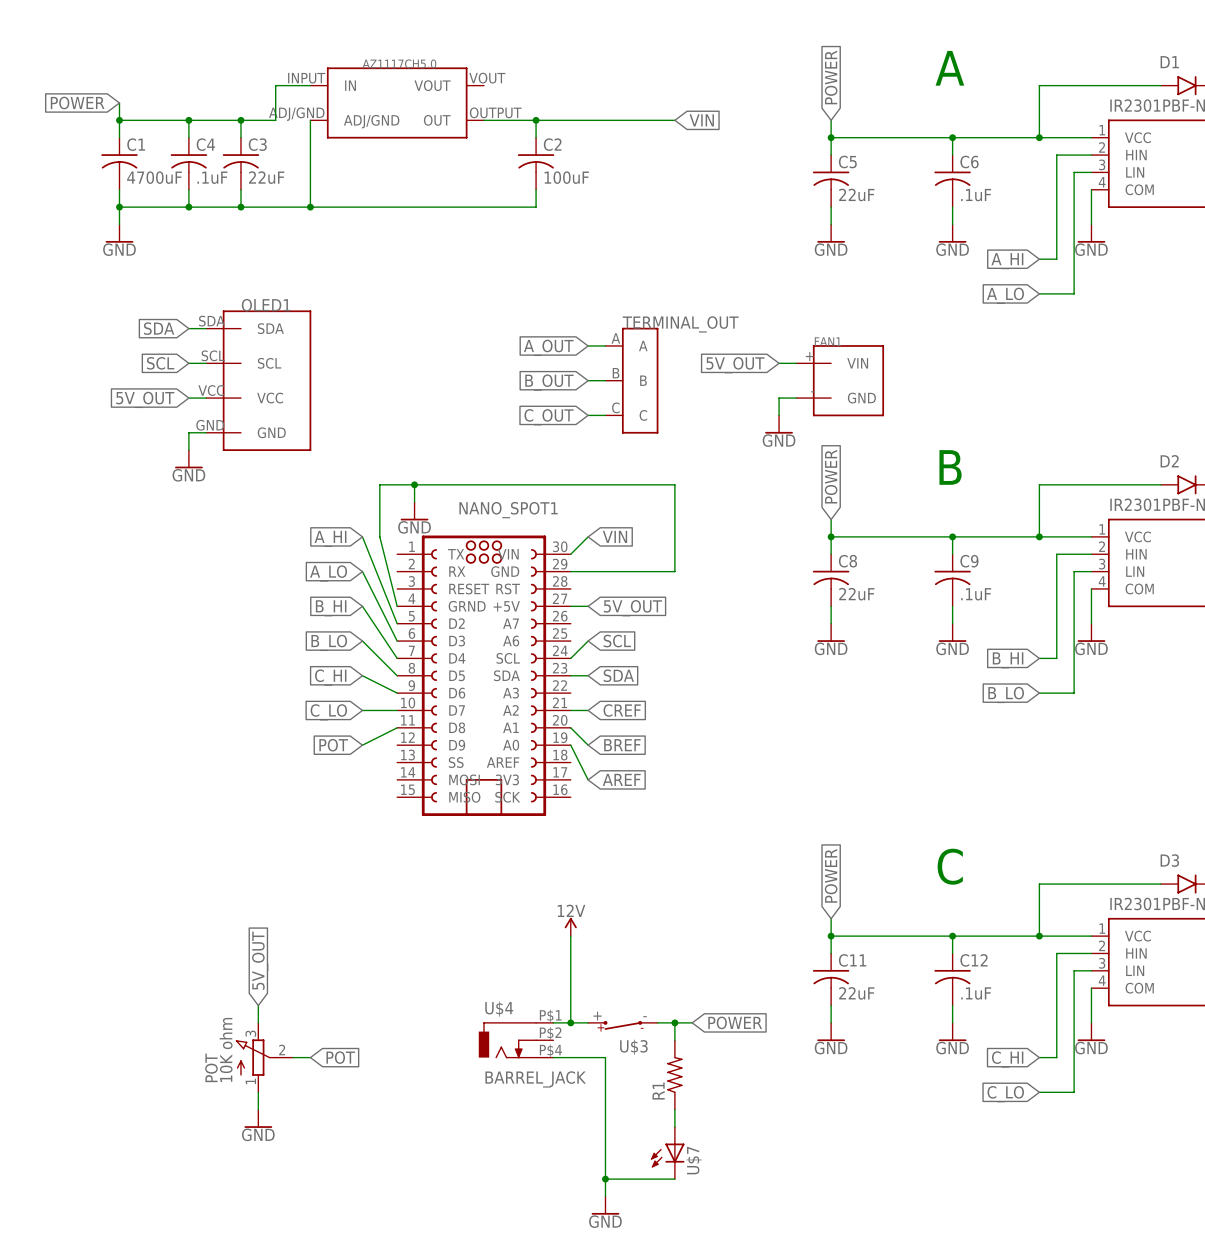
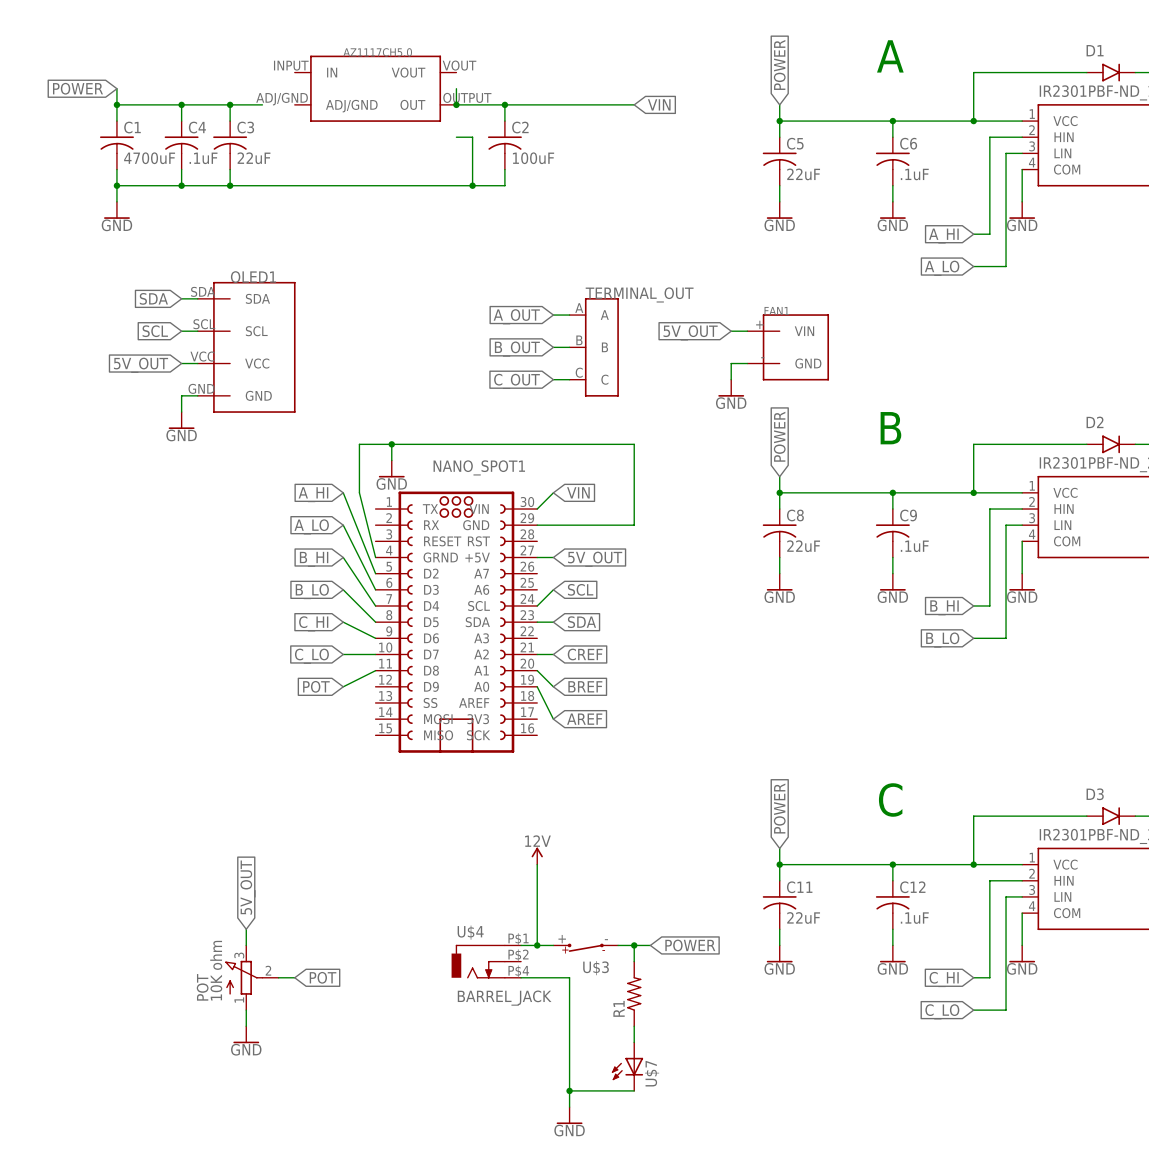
wire: (310, 85) (275, 85) (275, 120) -> none
wire: none -> (456, 88) (456, 104)
wire: (310, 120) (310, 207) -> none
junction: none -> (456, 104)
wire: none -> (456, 137) (472, 137) (472, 185)
junction: (310, 207) -> none
junction: none -> (472, 185)

